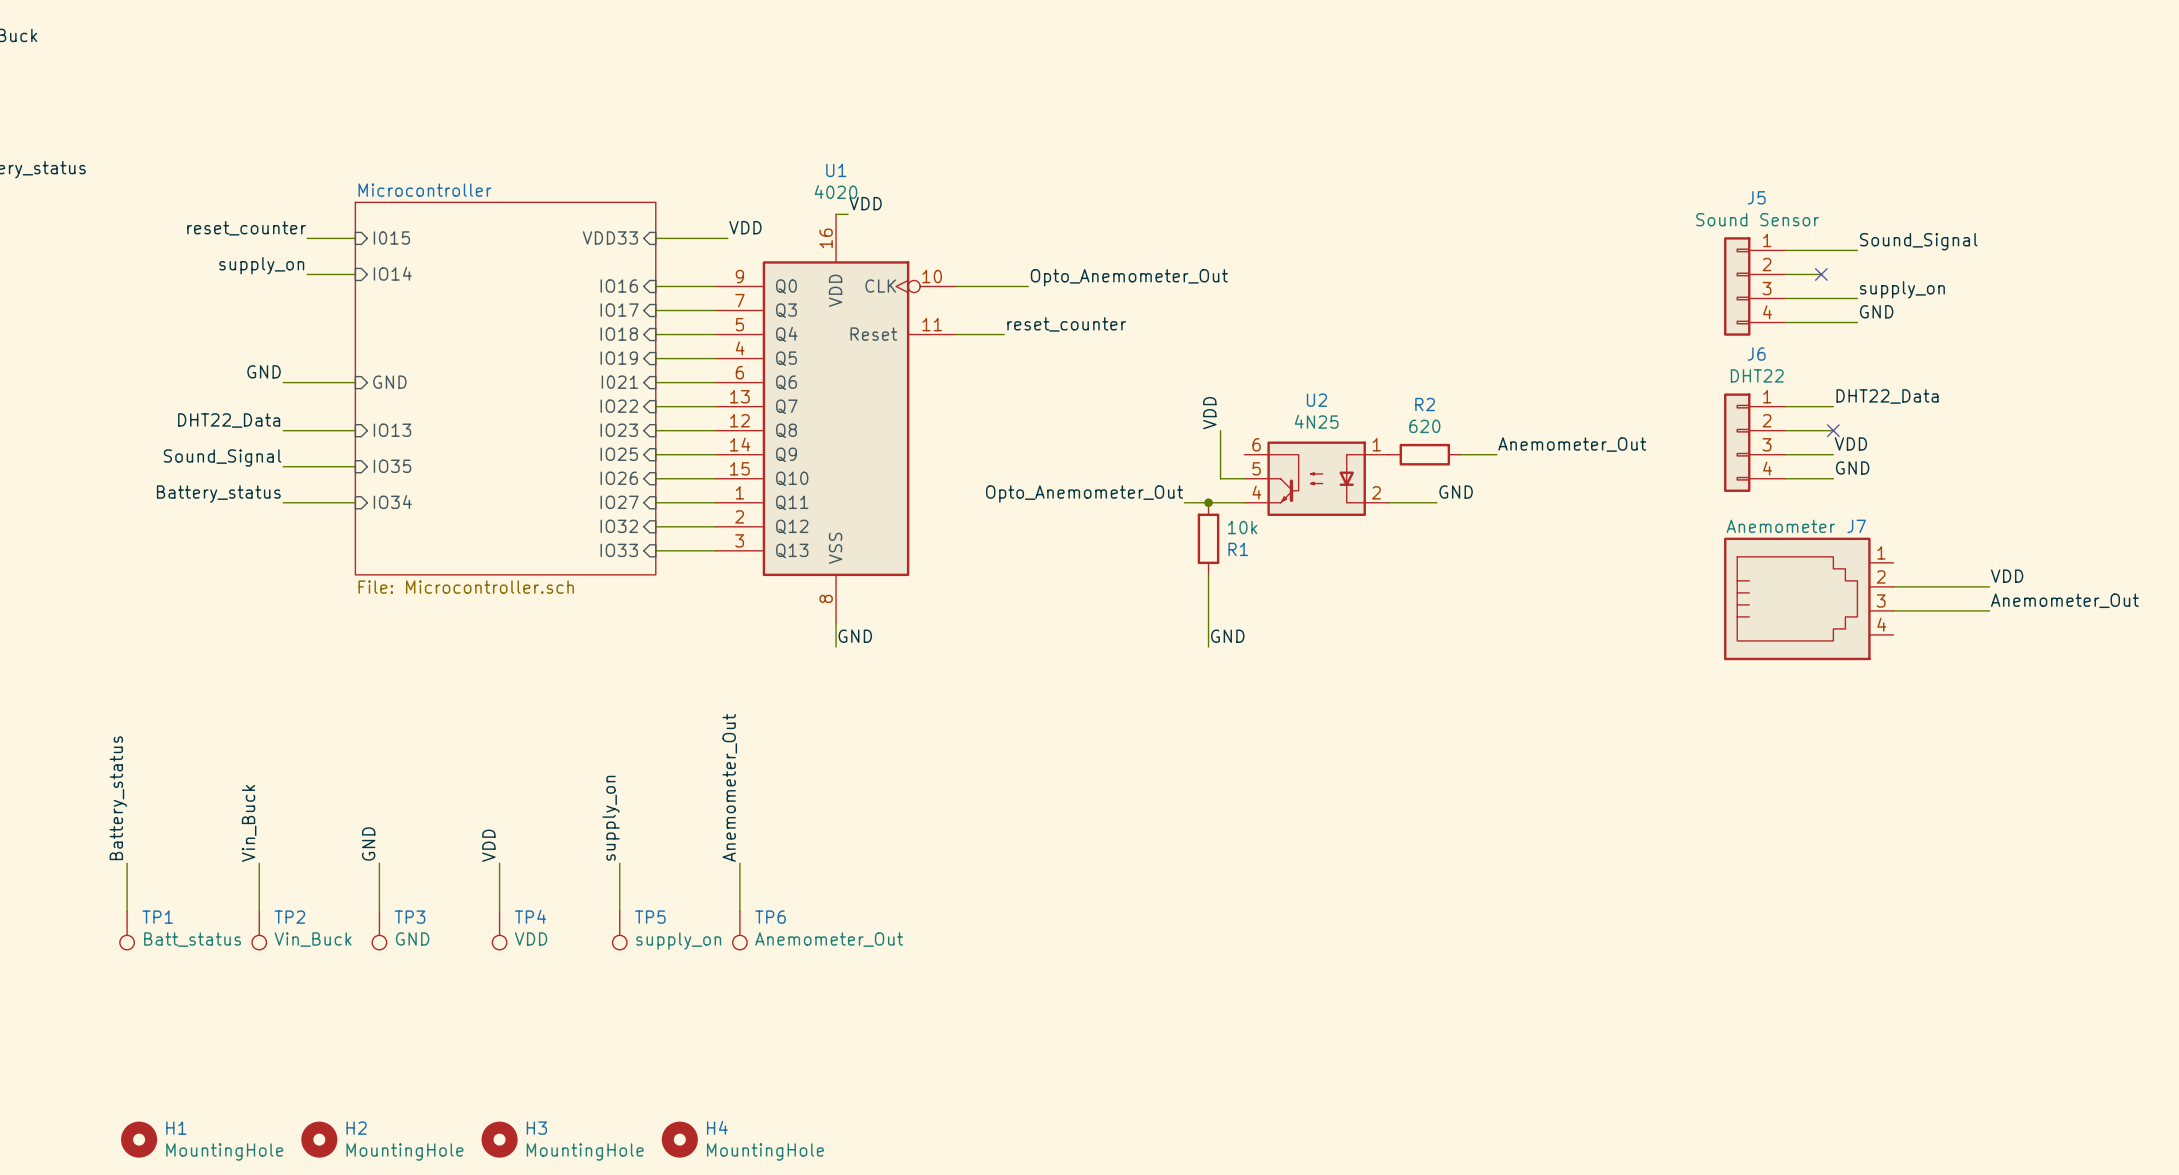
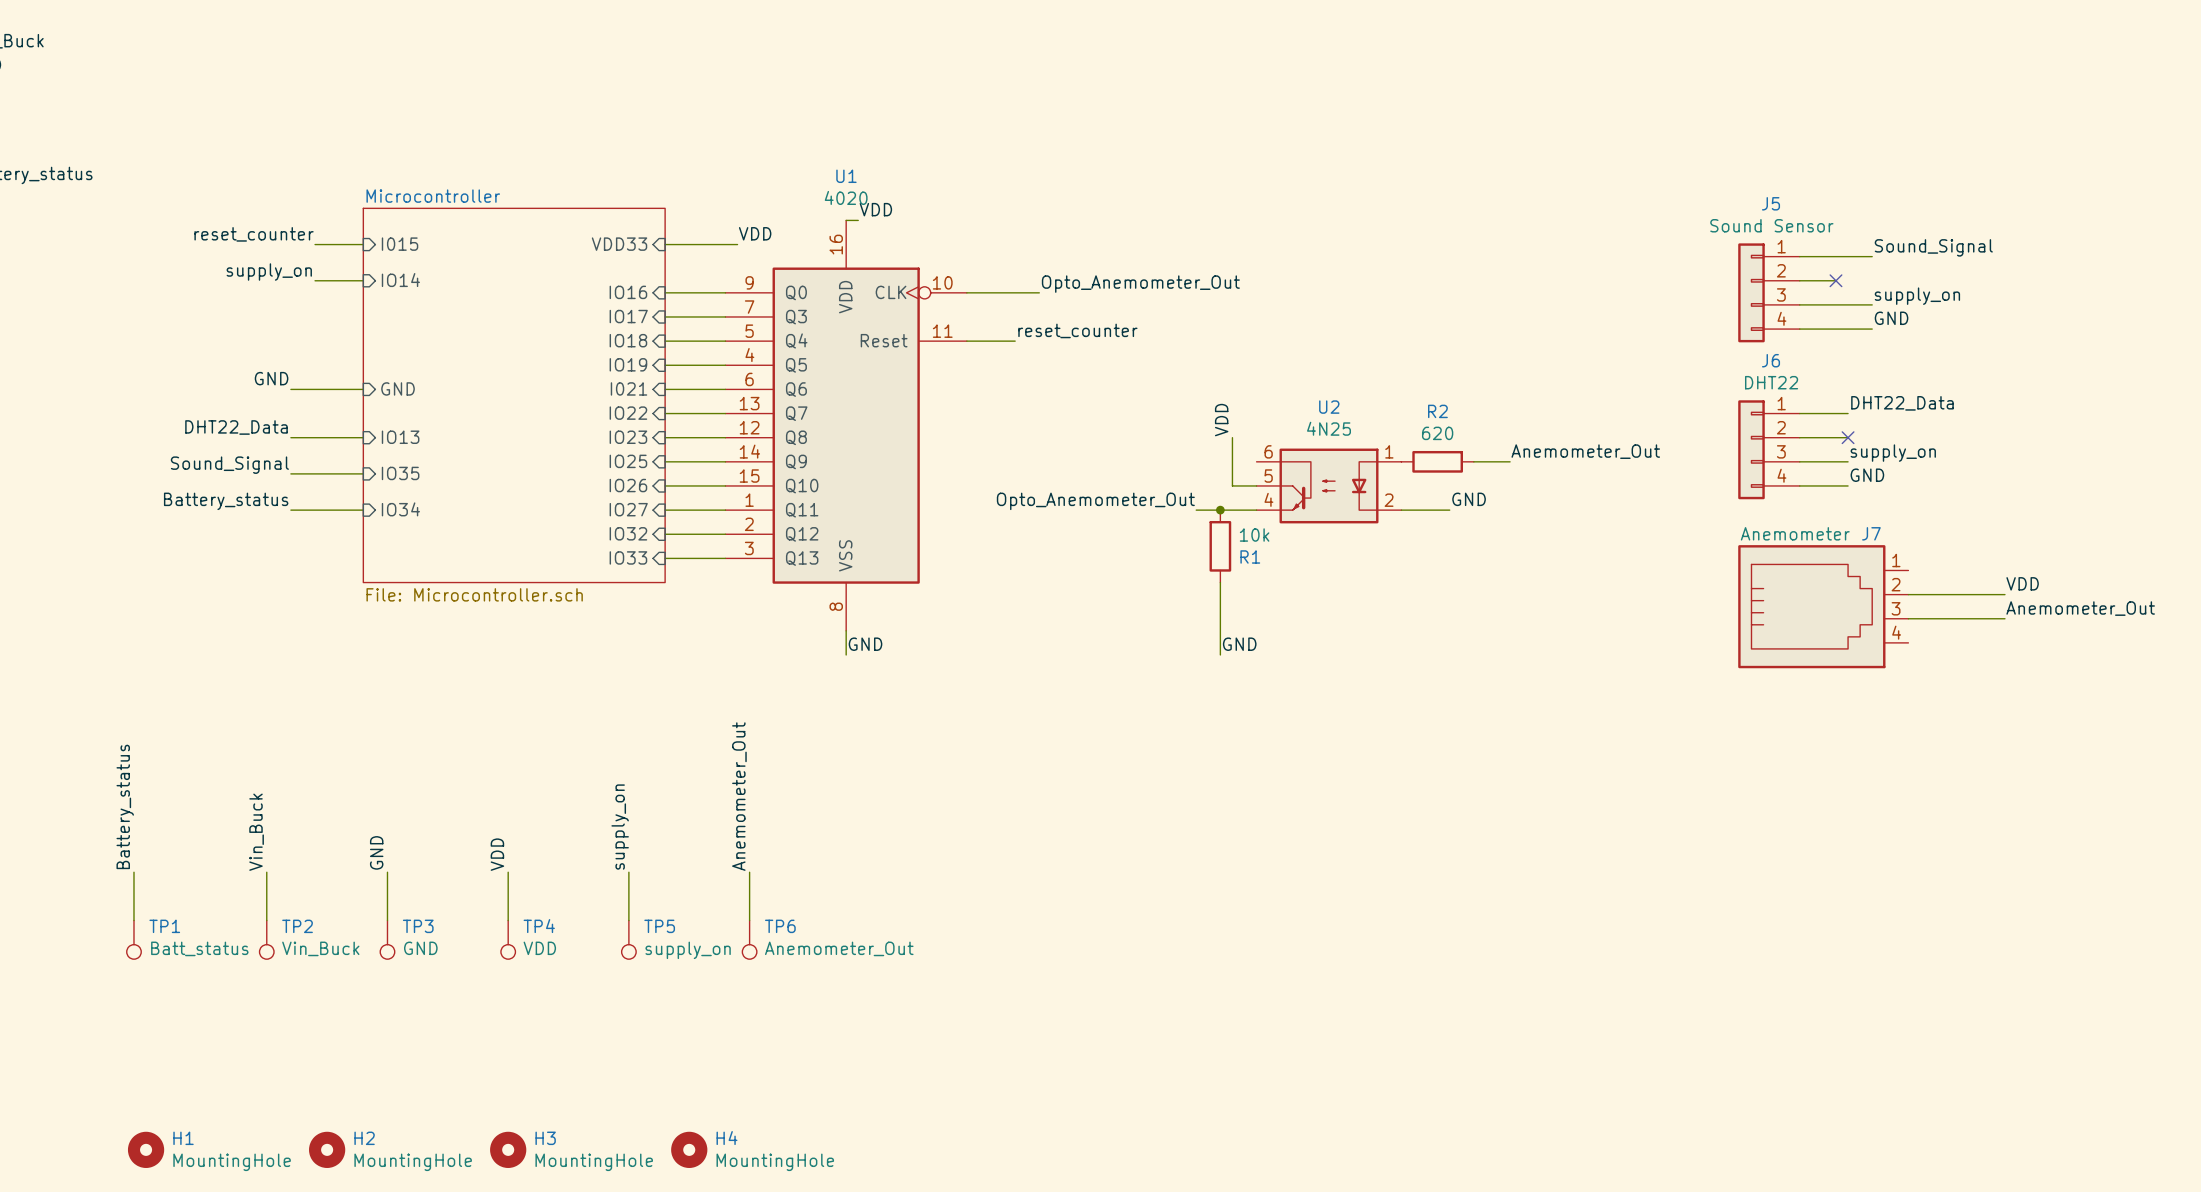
label: VDD (1850, 443) -> supply_on (1893, 453)

